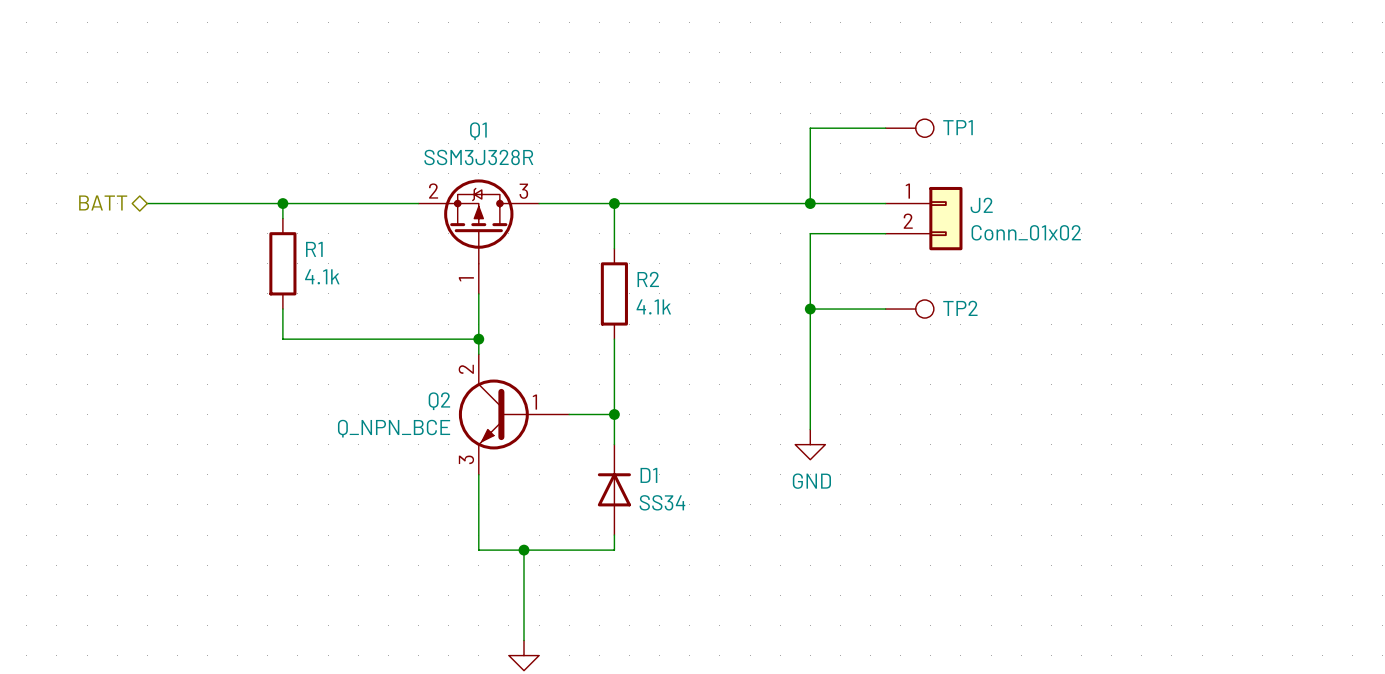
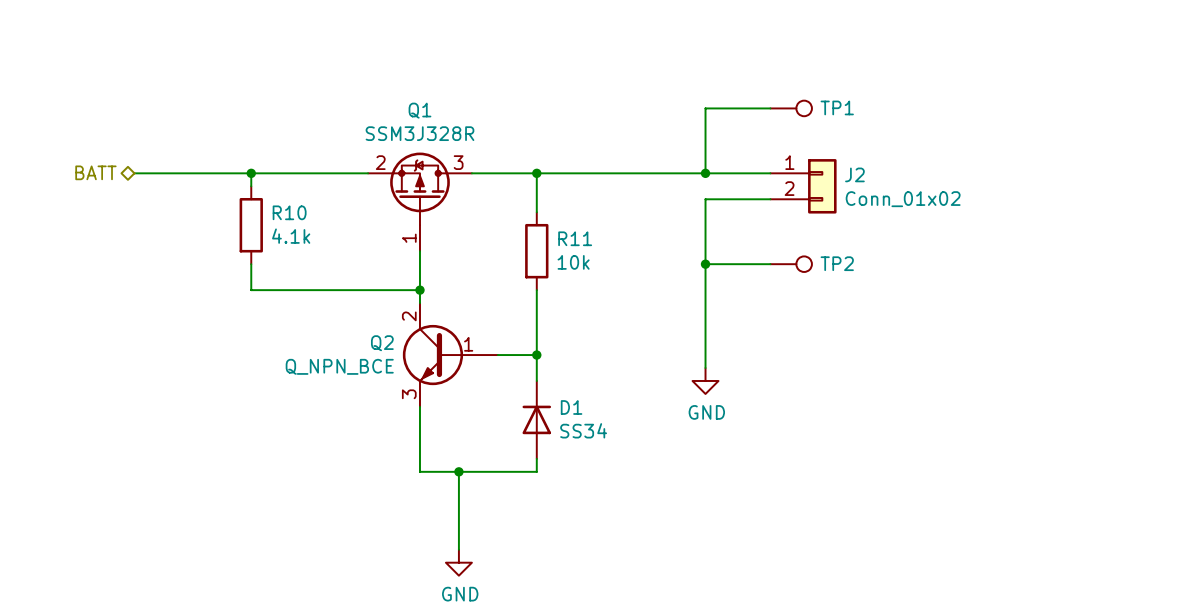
R1 name: R1 (314, 249) -> R10 (289, 212)
R2 name: R2 (648, 279) -> R11 (575, 238)
R2 value: 4.1k (653, 306) -> 10k (573, 262)

